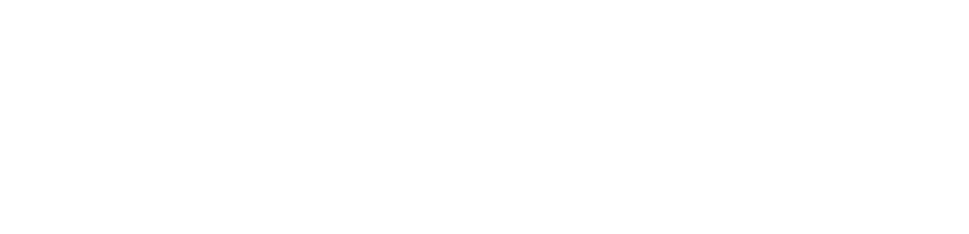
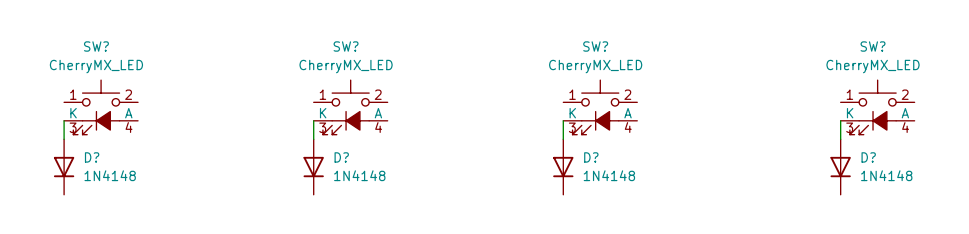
SW?: none -> CherryMX_LED (101, 107)
SW?: none -> CherryMX_LED (350, 107)
SW?: none -> CherryMX_LED (600, 107)
SW?: none -> CherryMX_LED (877, 107)
wire: none -> (64, 120) (64, 139)
wire: none -> (313, 120) (313, 139)
wire: none -> (563, 120) (563, 139)
wire: none -> (840, 120) (840, 139)
D?: none -> 1N4148 (64, 167)
D?: none -> 1N4148 (313, 167)
D?: none -> 1N4148 (563, 167)
D?: none -> 1N4148 (840, 167)

